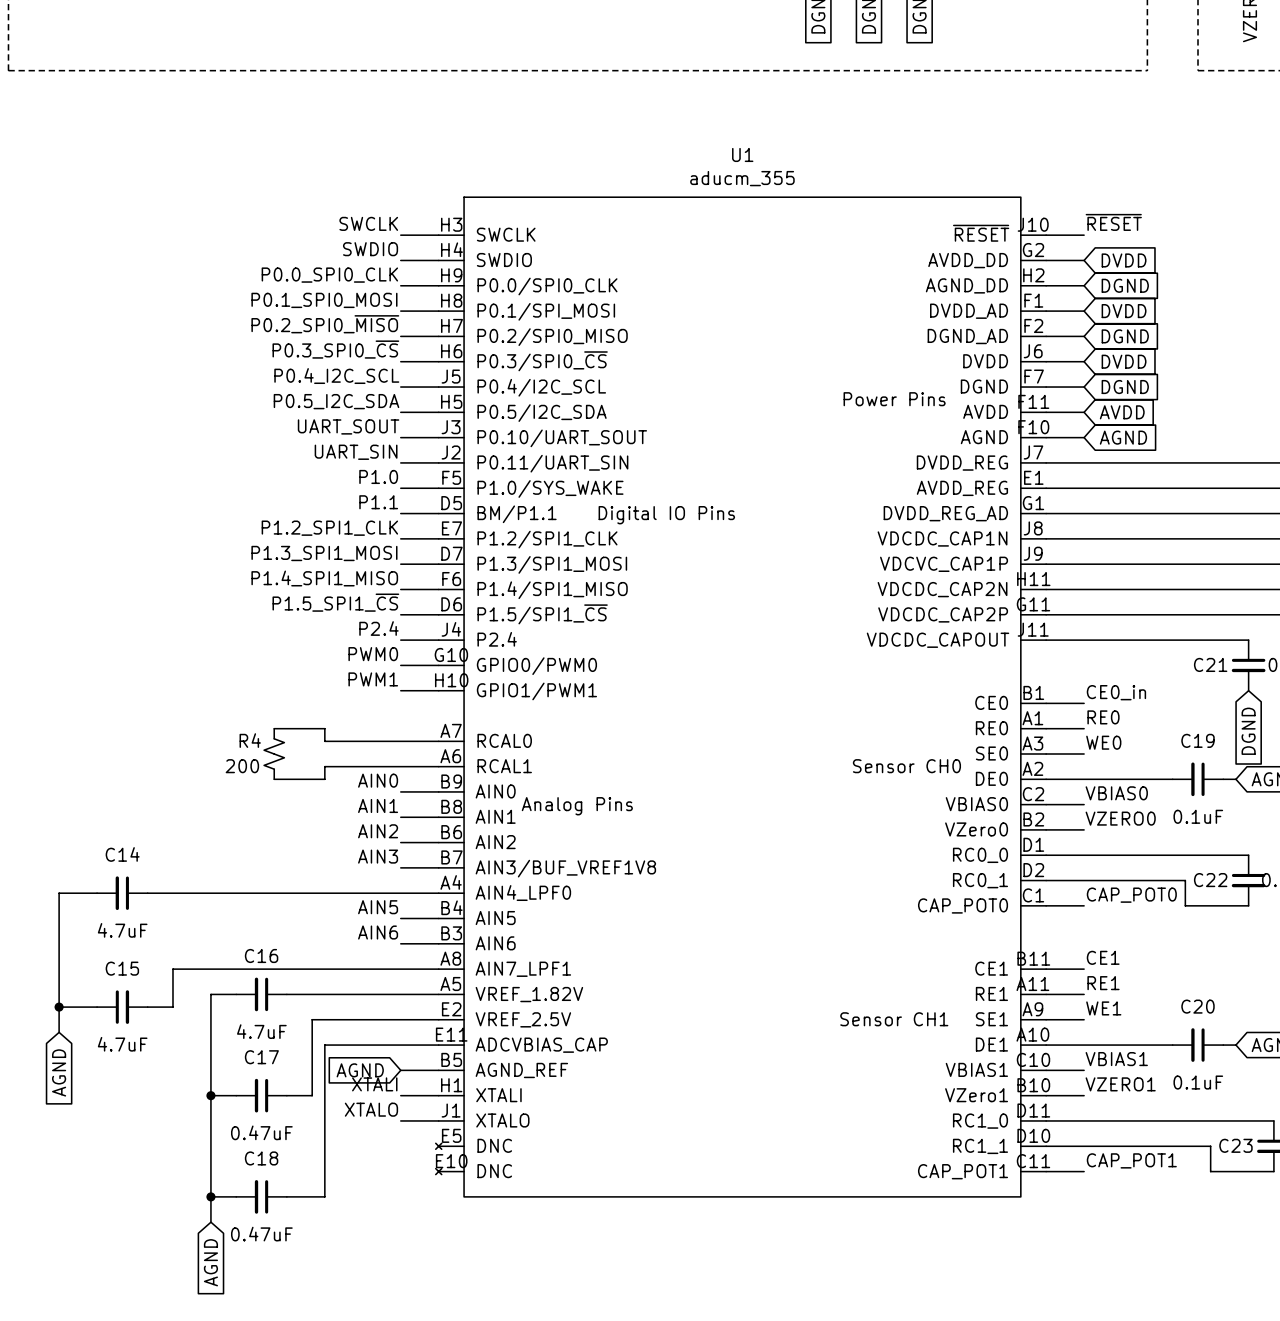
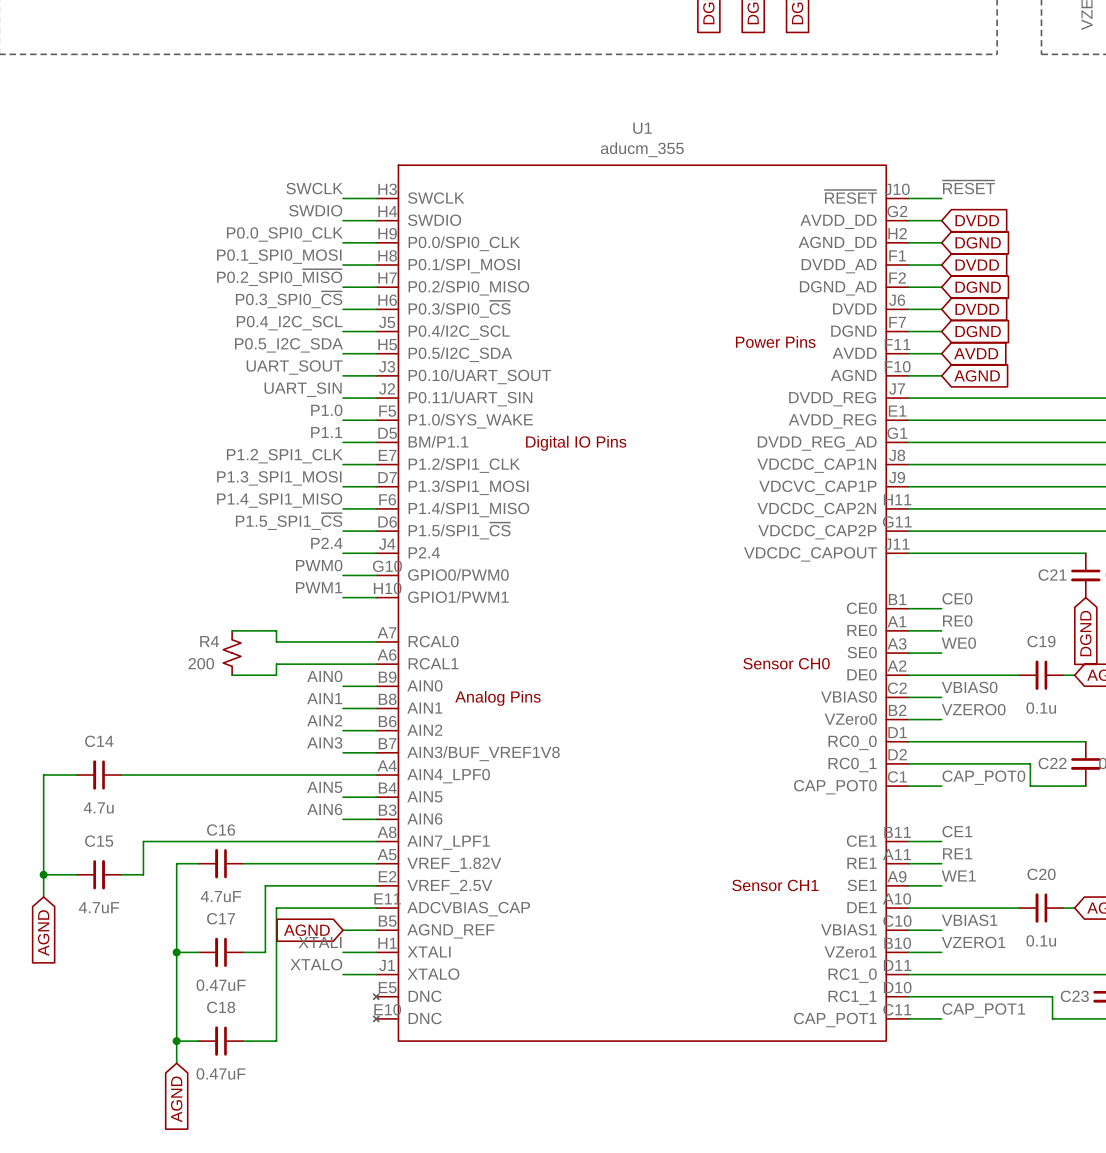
label: CE0_in (1116, 692) -> CE0 (957, 598)
C19 value: 0.1uF (1198, 816) -> 0.1u (1041, 708)
C14 value: 4.7uF (122, 930) -> 4.7u (98, 807)
C20 value: 0.1uF (1198, 1082) -> 0.1u (1041, 940)

